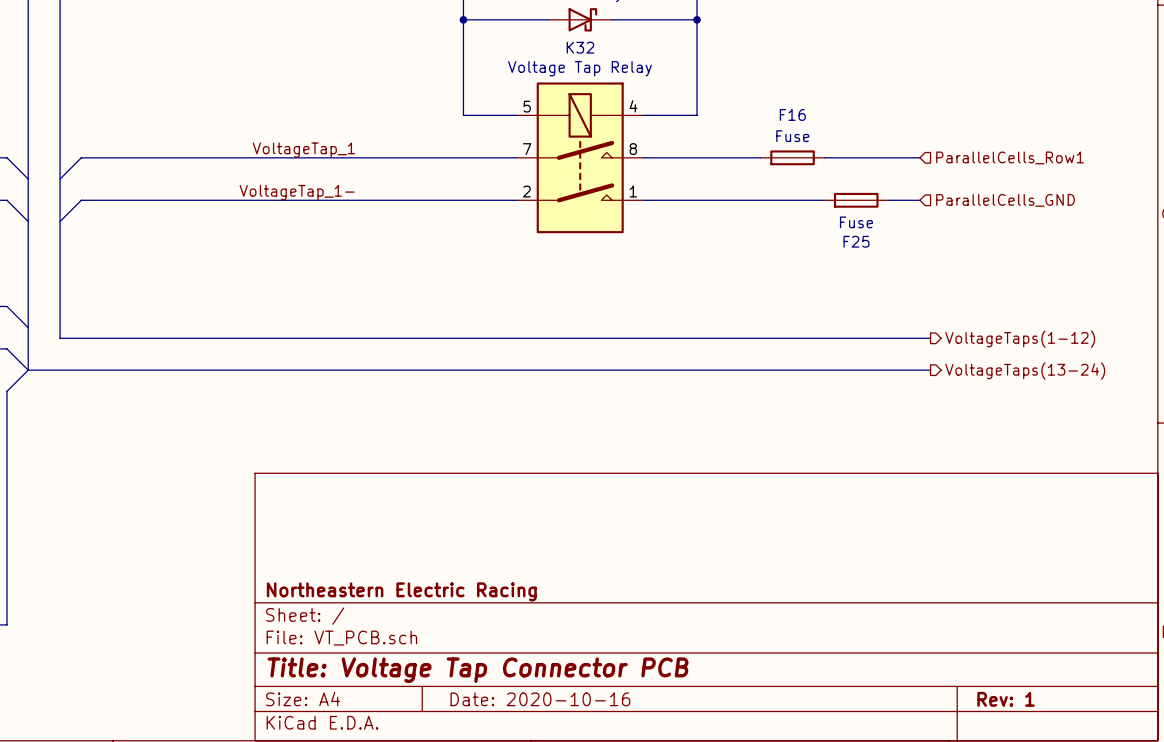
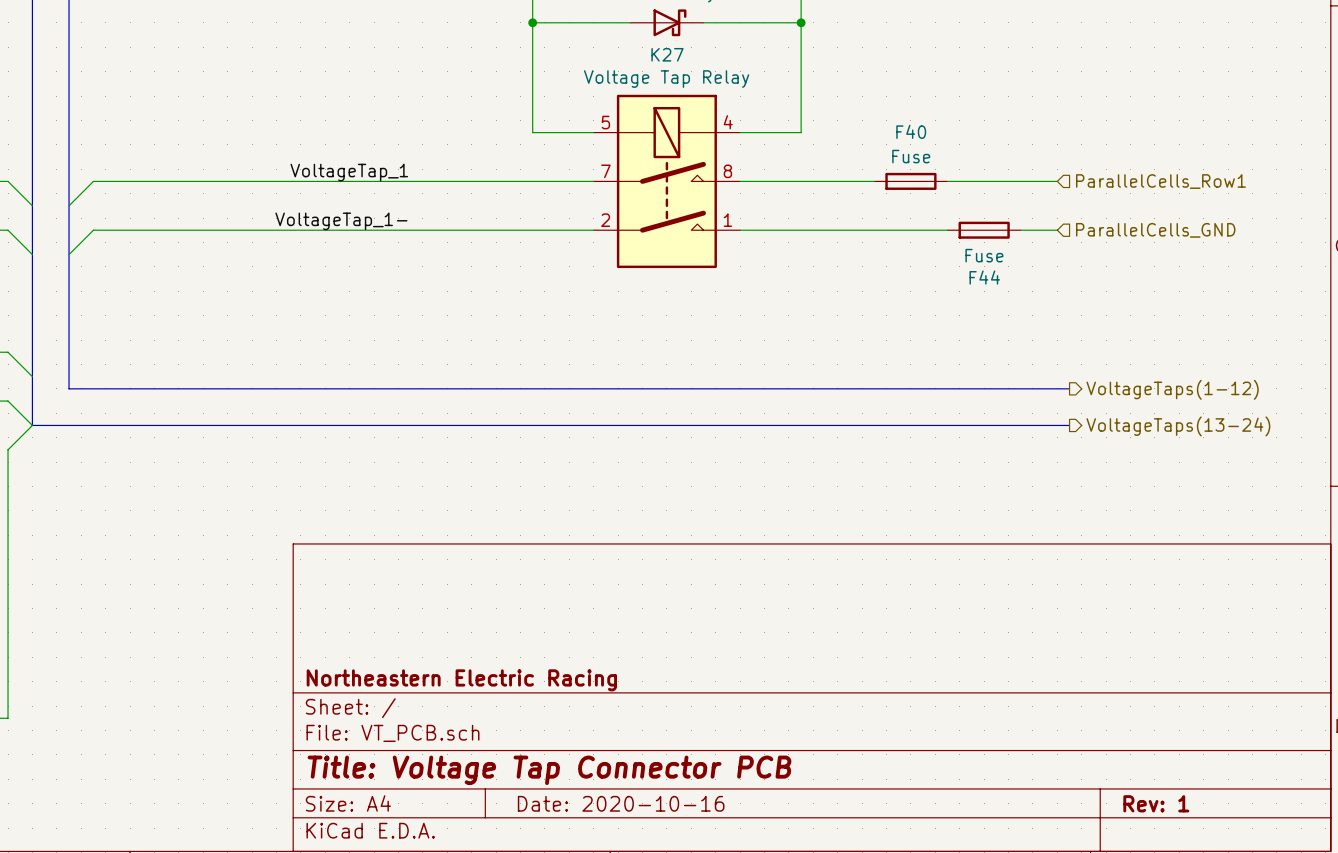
K32 name: K32 (580, 47) -> K27 (667, 54)
F16 name: F16 (792, 114) -> F40 (911, 131)
F25 name: F25 (856, 241) -> F44 (984, 277)

